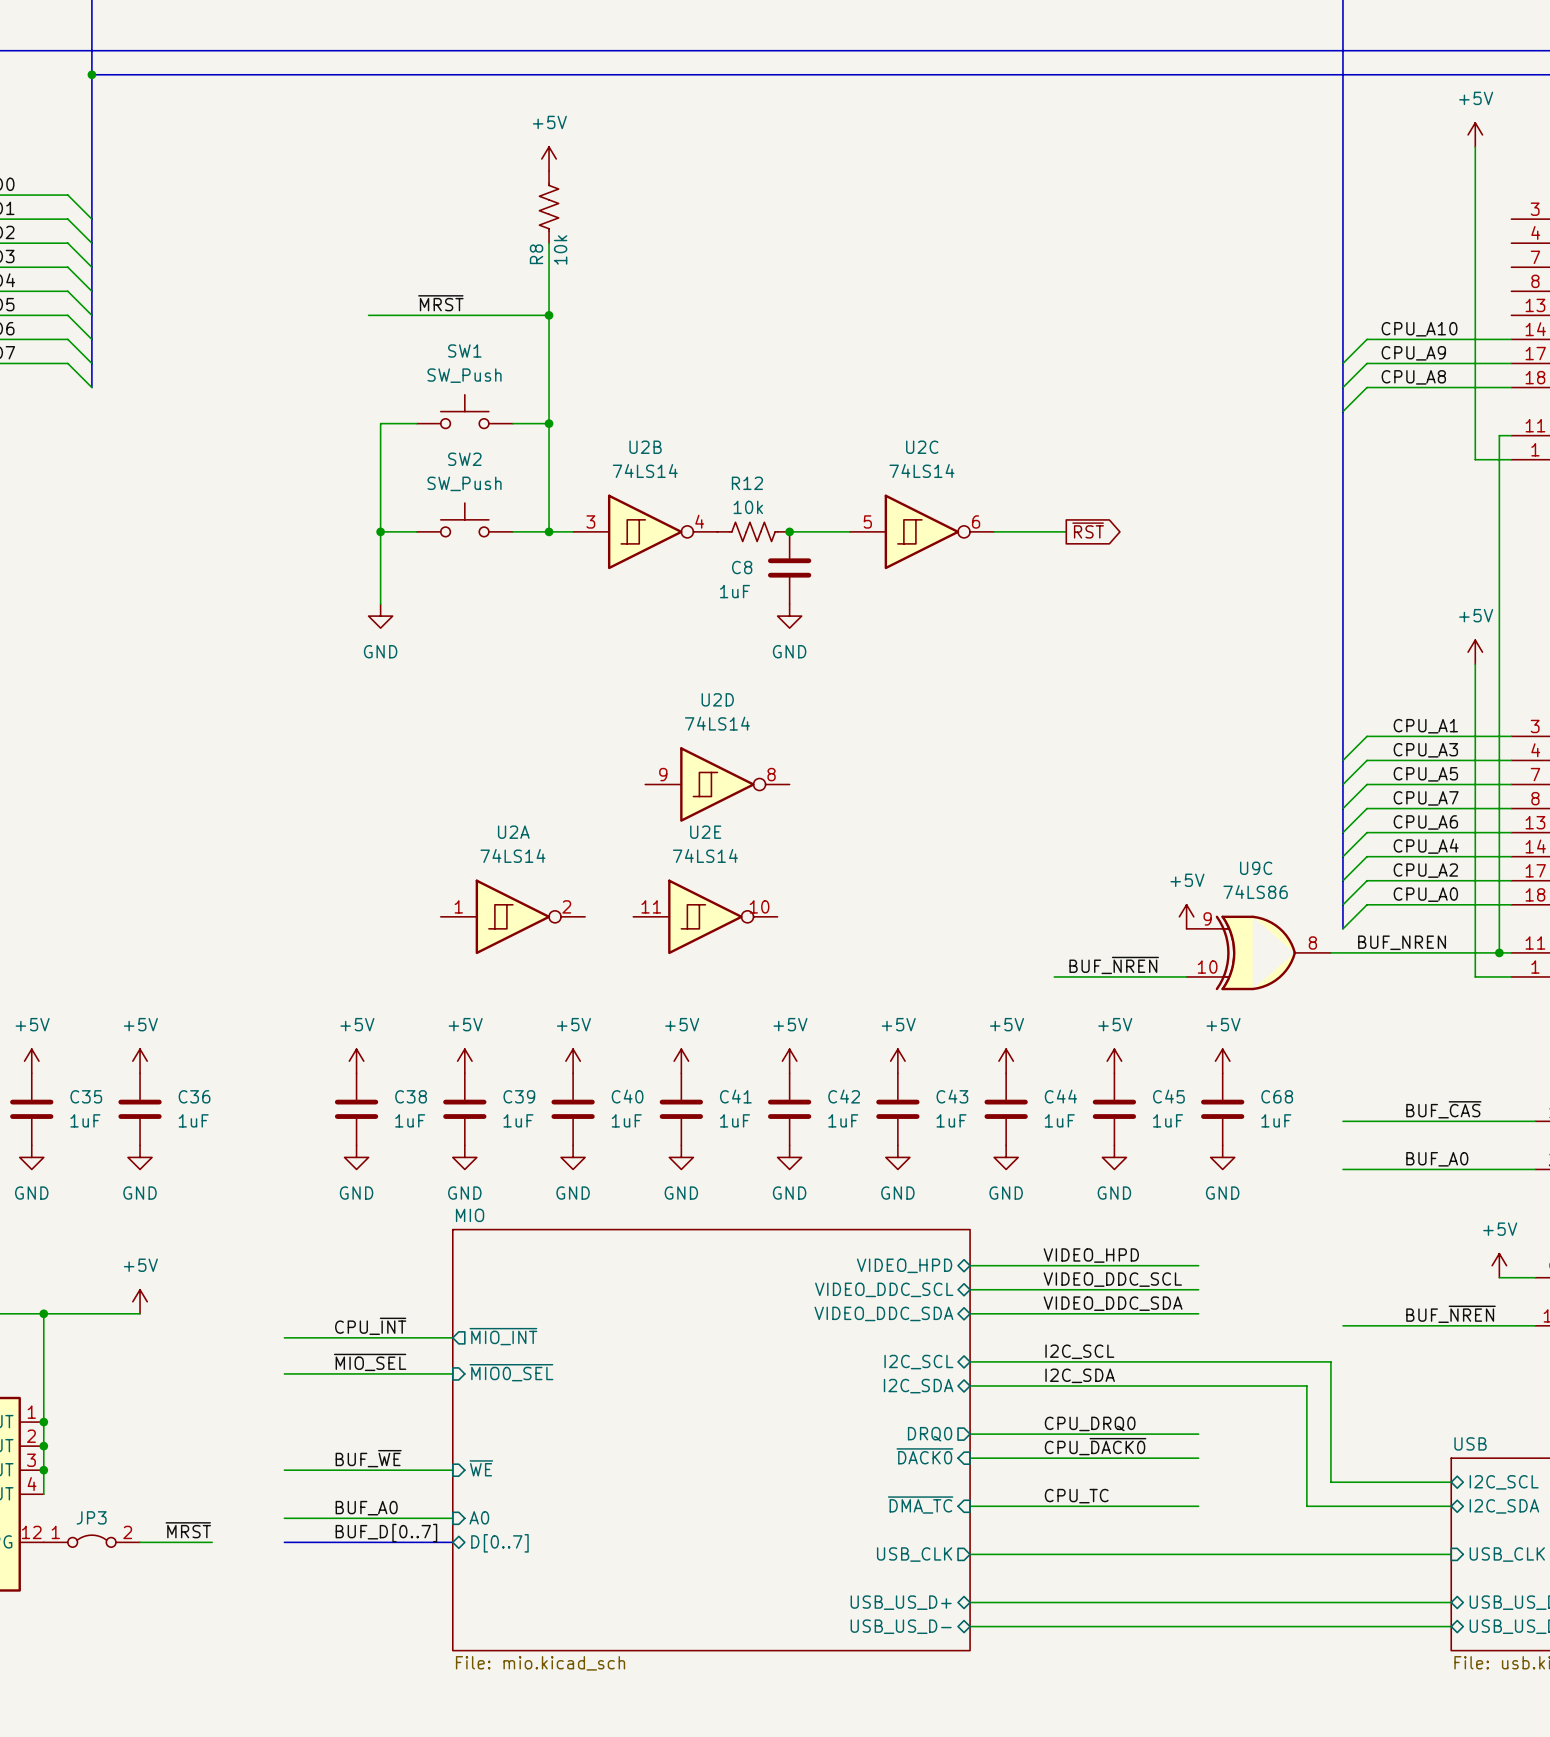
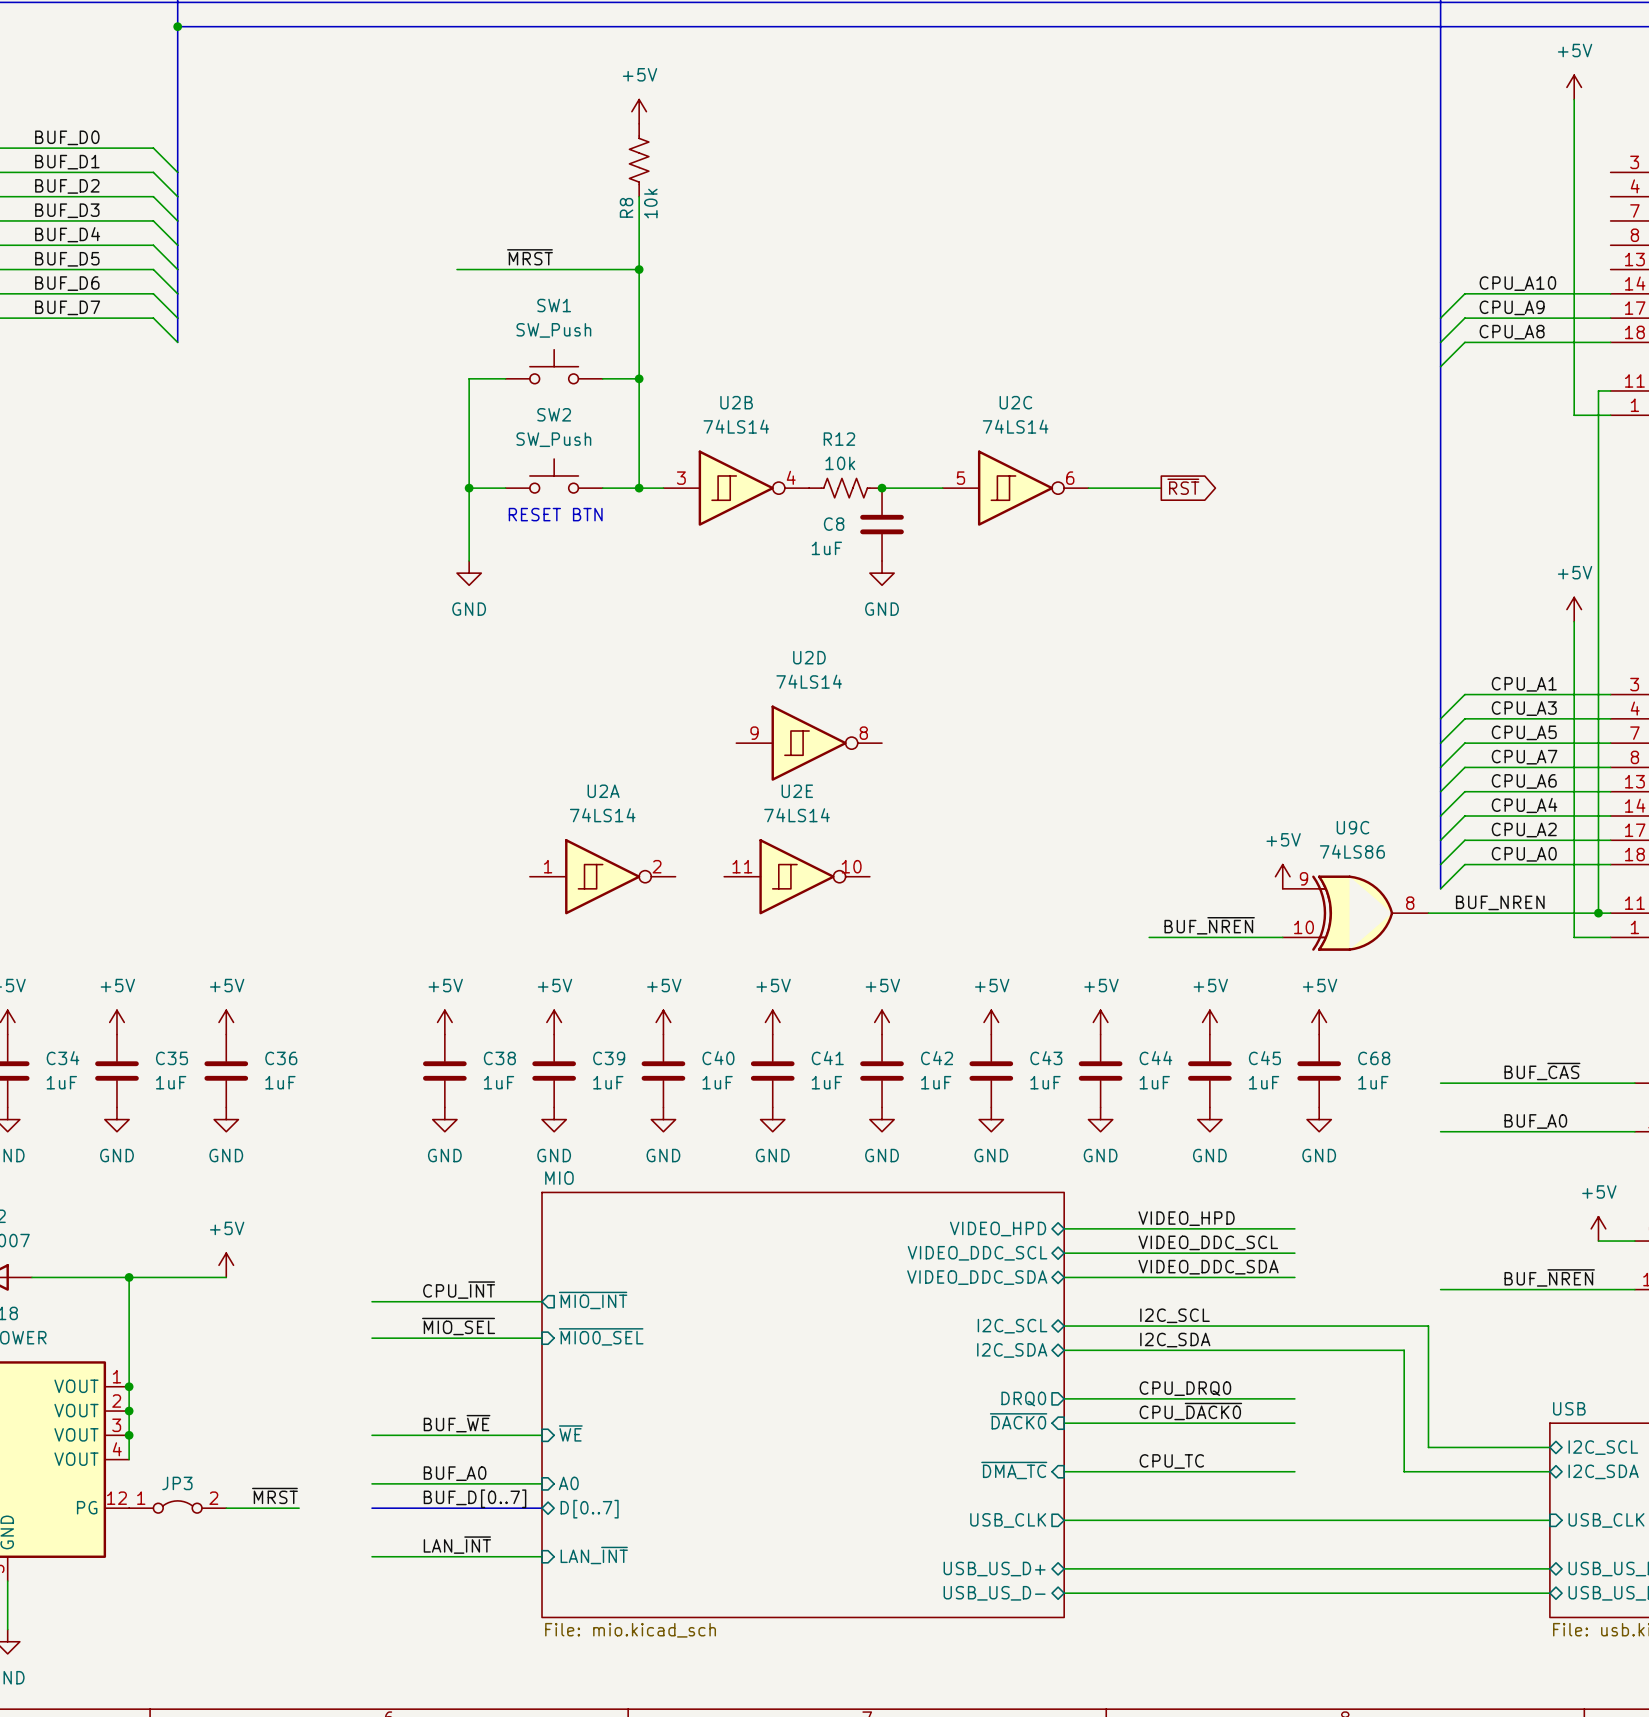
text: none -> RESET BTN (555, 514)
label: none -> LAN_~{INT} (457, 1545)
sheet pin: none -> LAN_~{INT} (594, 1555)
wire: none -> (371, 1556) (542, 1556)

